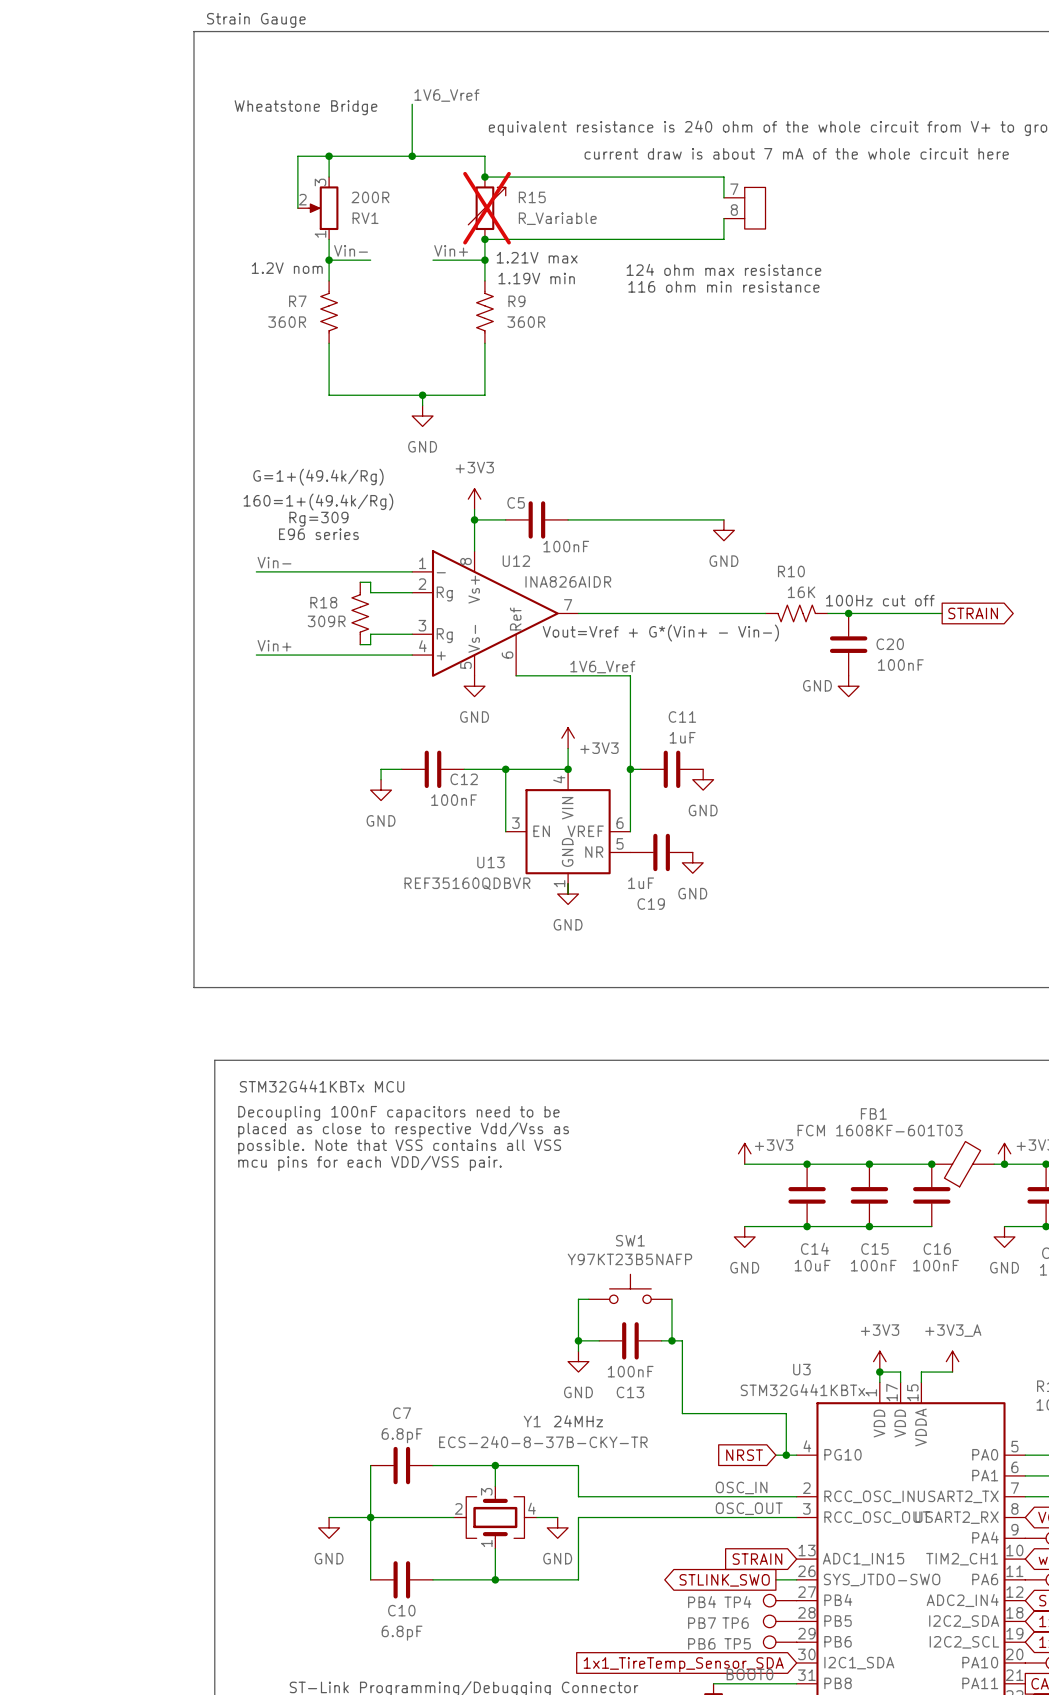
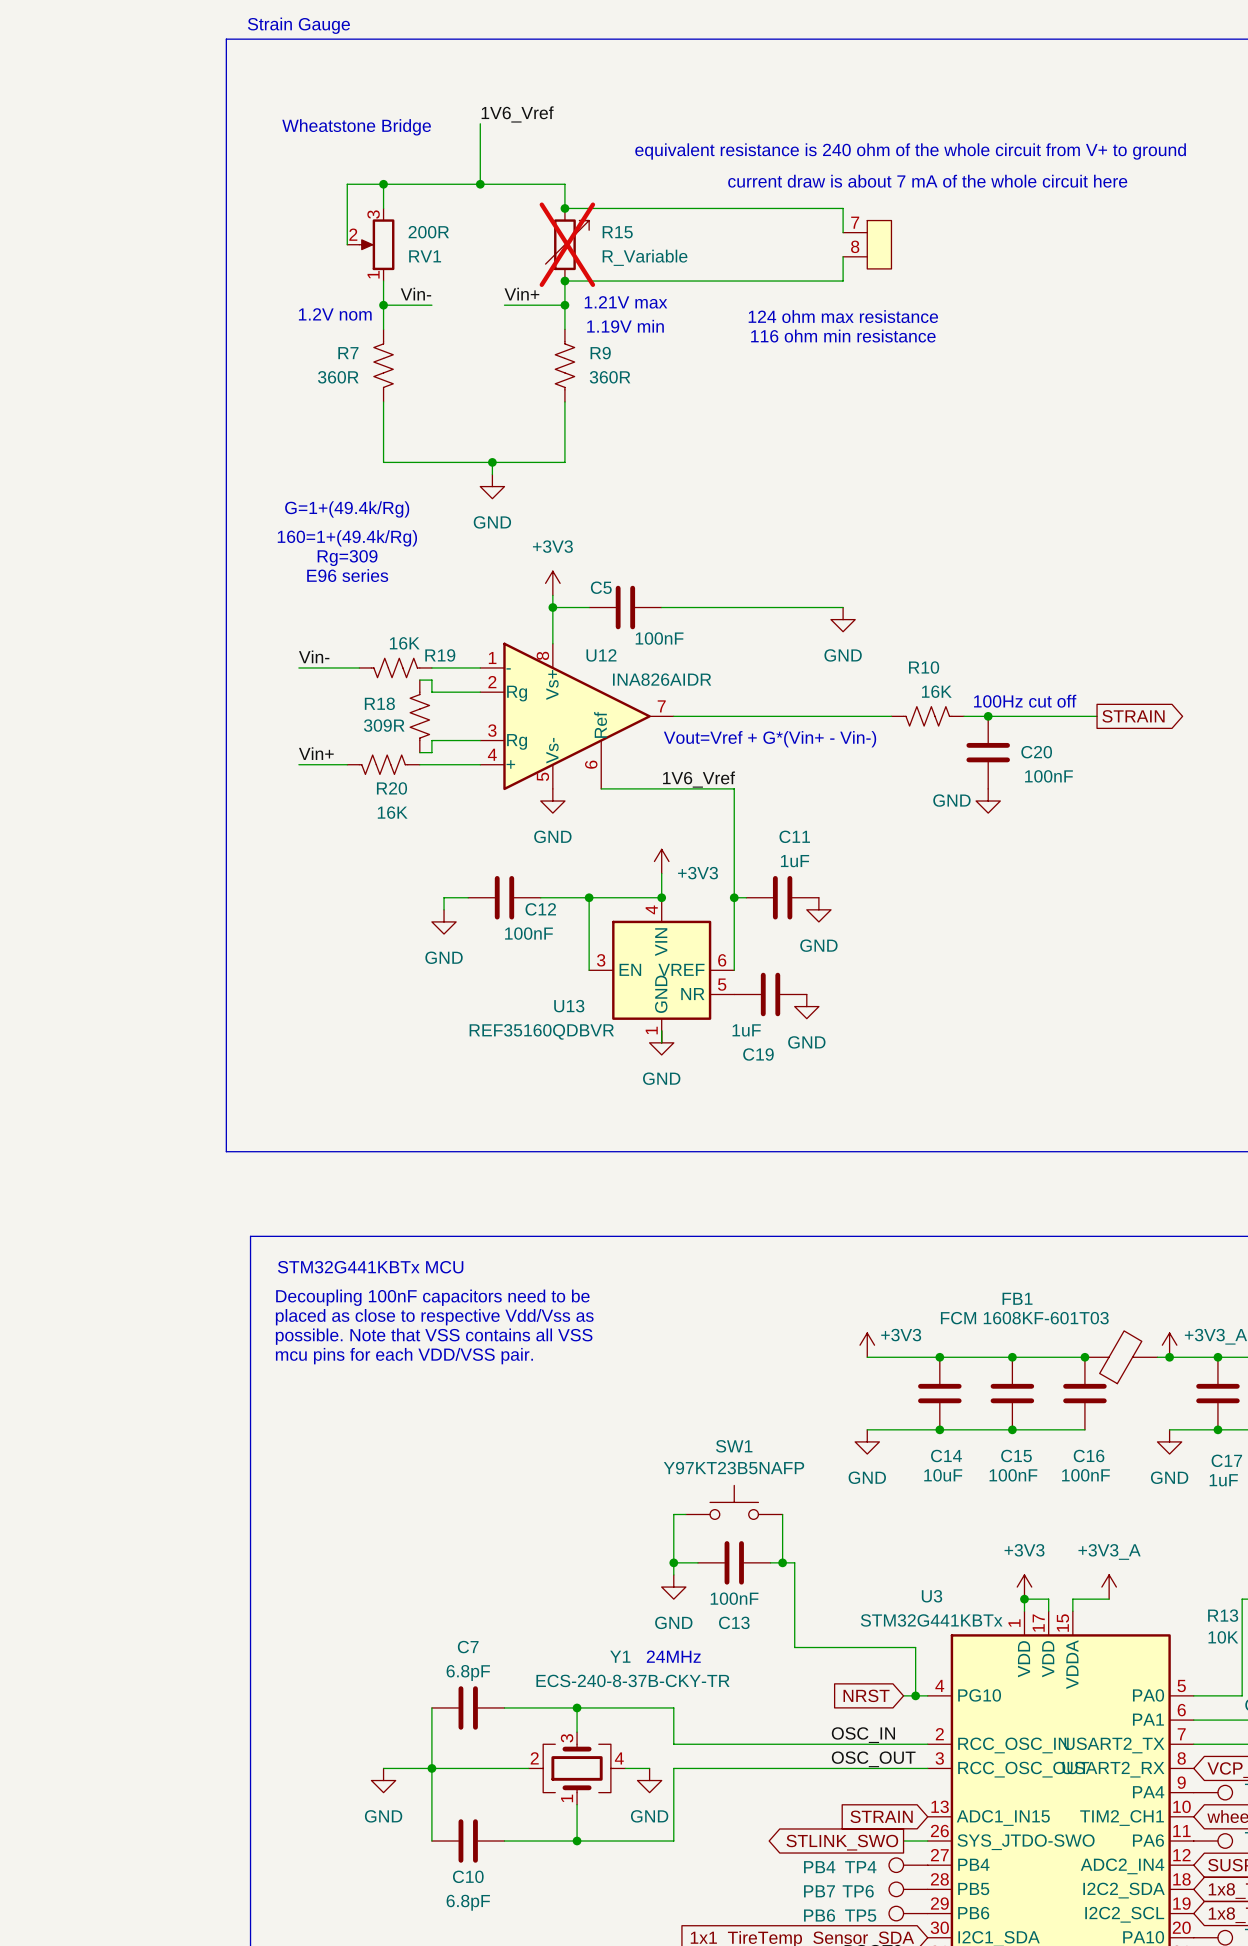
text position: G=1+(49.4k/Rg) (318, 477) -> G=1+(49.4k/Rg) (347, 509)
text position: 160=1+(49.4k/Rg) (318, 502) -> 160=1+(49.4k/Rg) (347, 538)
text position: Rg=309 (318, 519) -> Rg=309 (347, 558)
text position: E96 series (318, 534) -> E96 series (347, 575)
R19: none -> 16K (395, 667)
R20: none -> 16K (383, 764)

